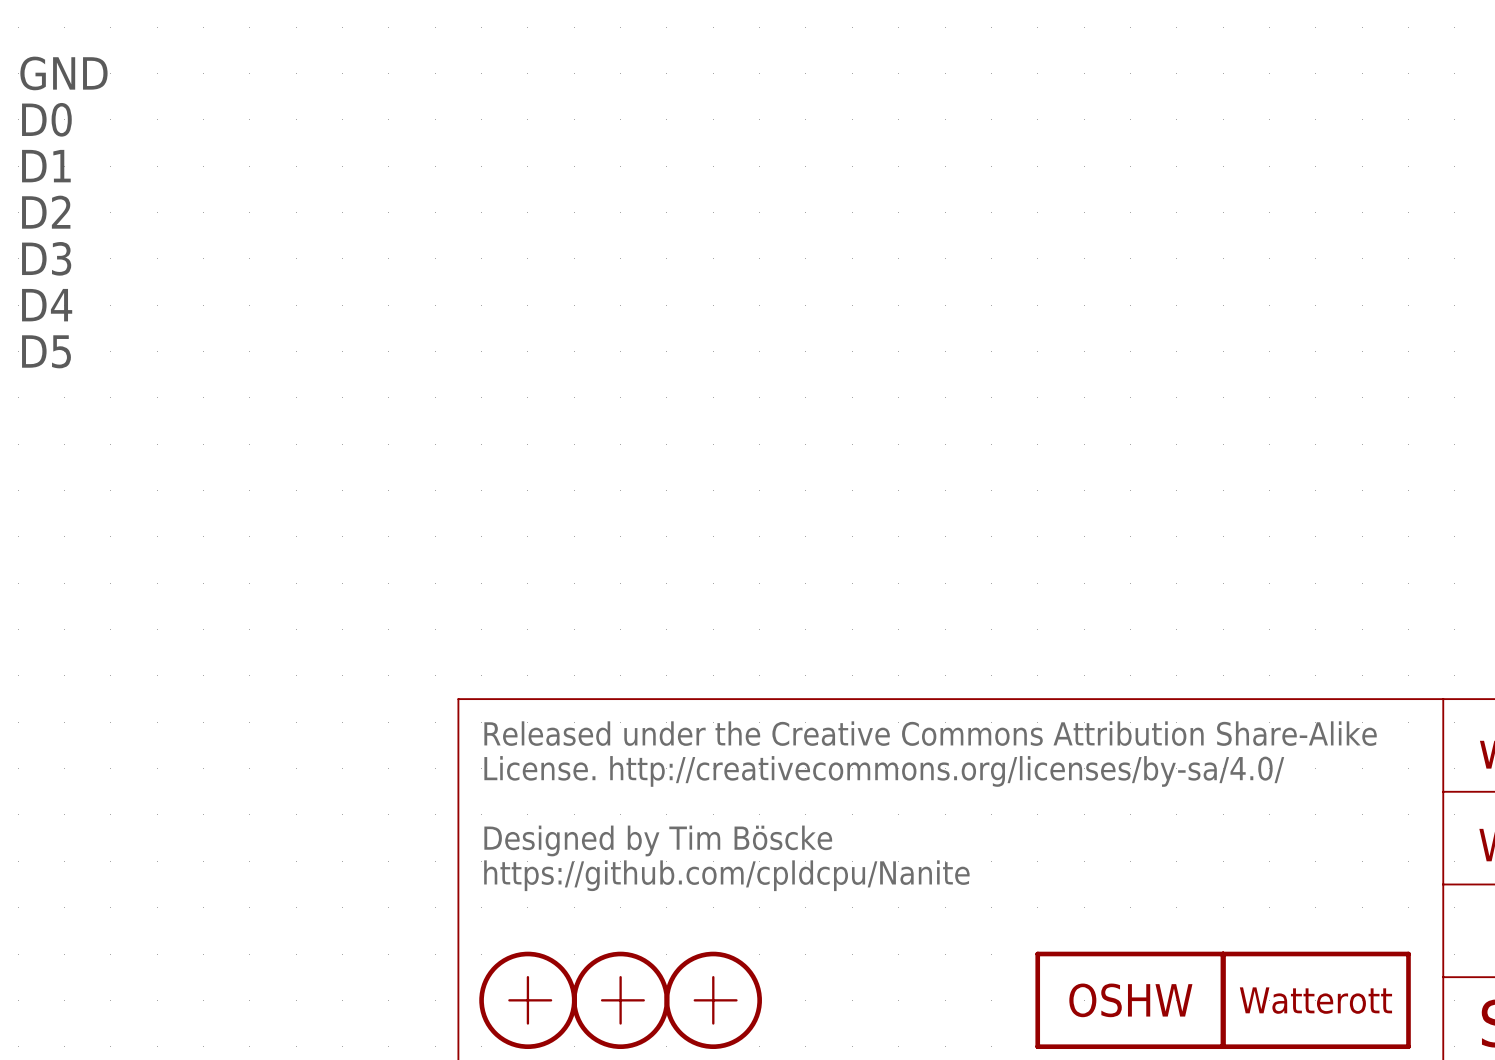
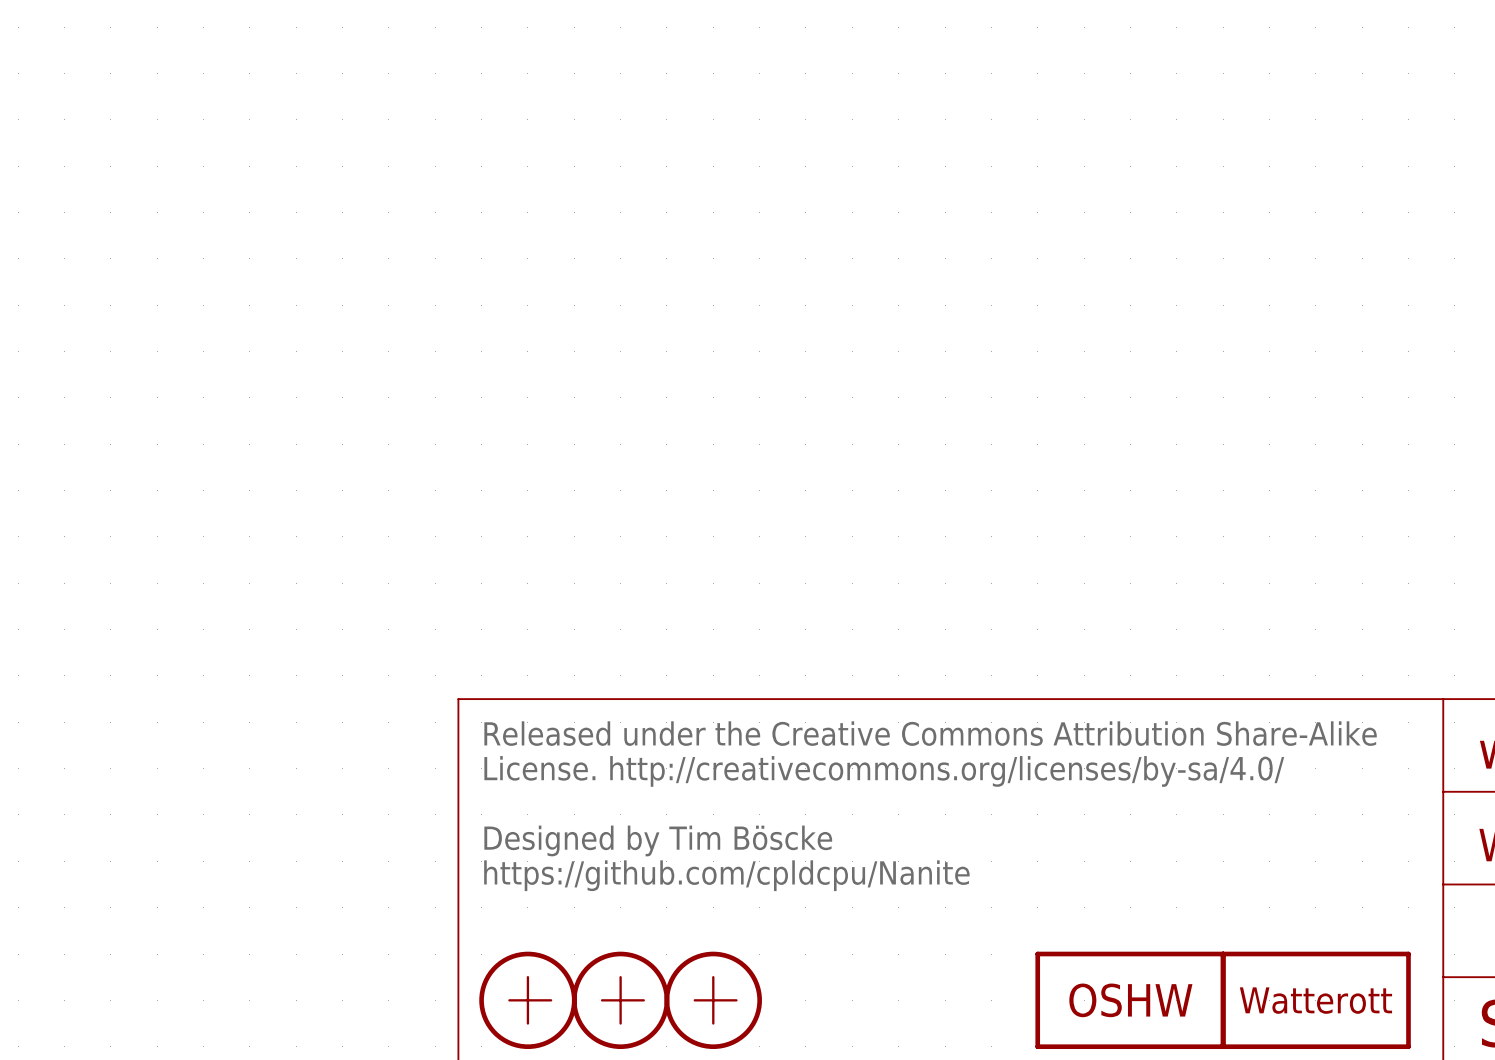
text: GND (63, 73) -> none
text: D0 (46, 119) -> none
text: D1 (46, 166) -> none
text: D2 (46, 212) -> none
text: D3 (46, 258) -> none
text: D4 (47, 305) -> none
text: D5 (46, 351) -> none

